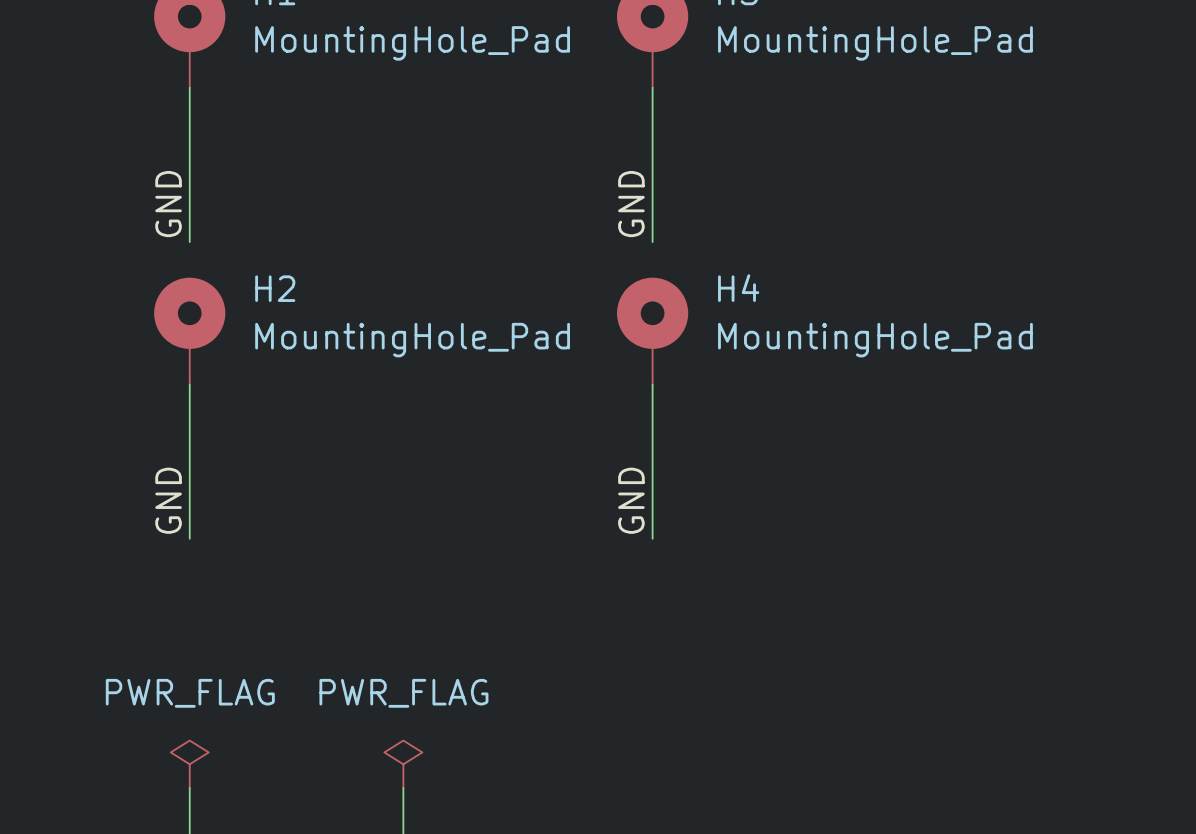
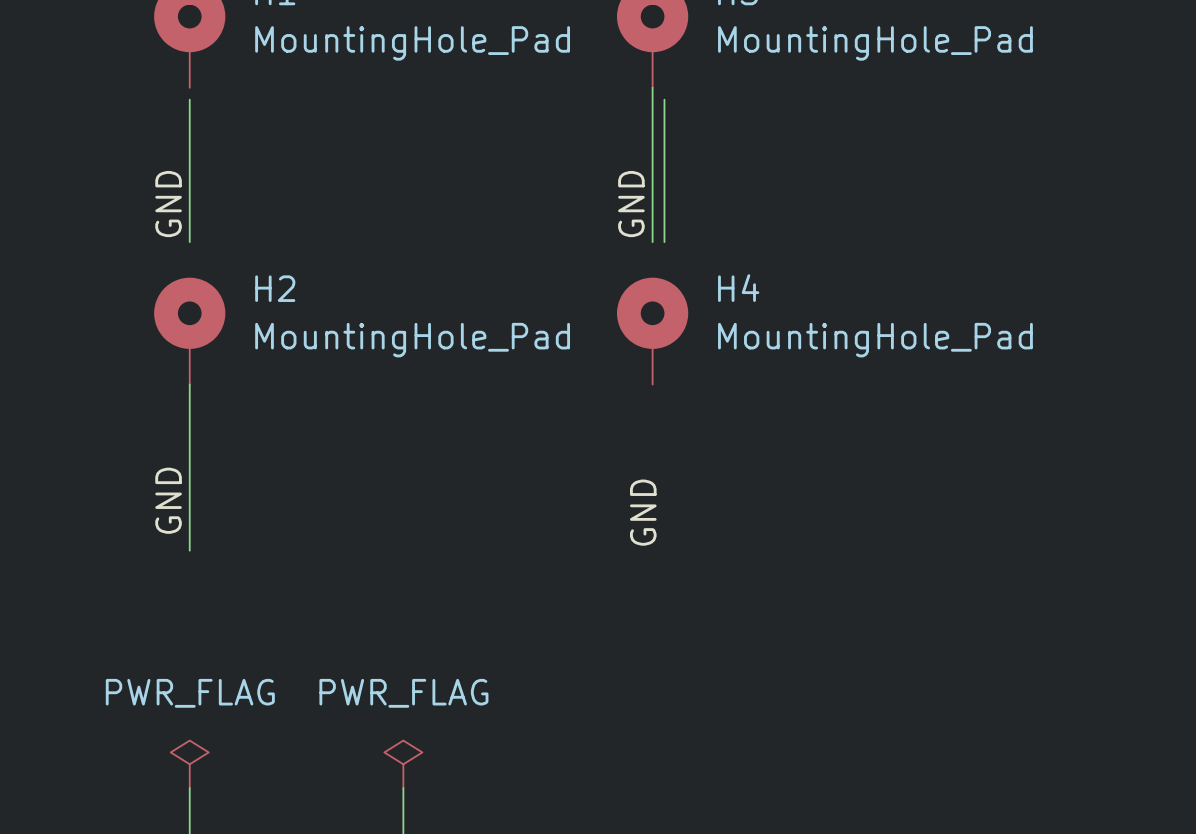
wire: (189, 87) (189, 99) -> (189, 538) (189, 550)
wire: none -> (664, 99) (664, 242)
wire: (652, 384) (652, 538) -> none
label position: GND (631, 500) -> GND (643, 512)

